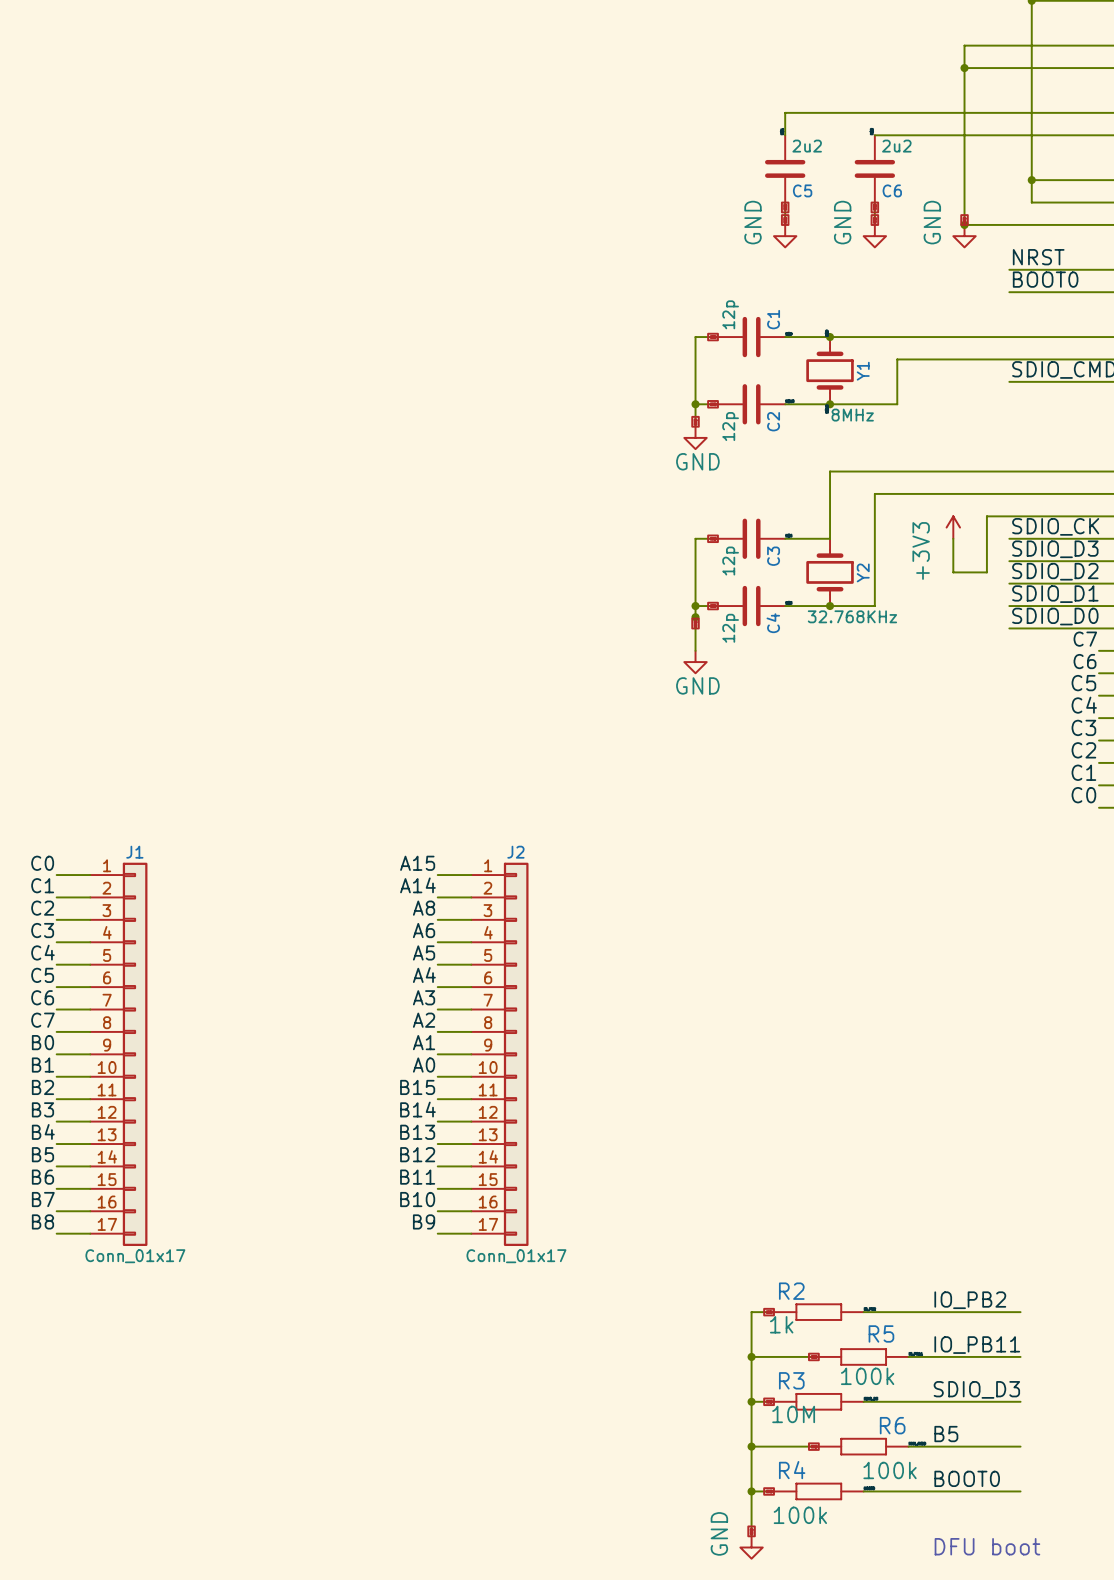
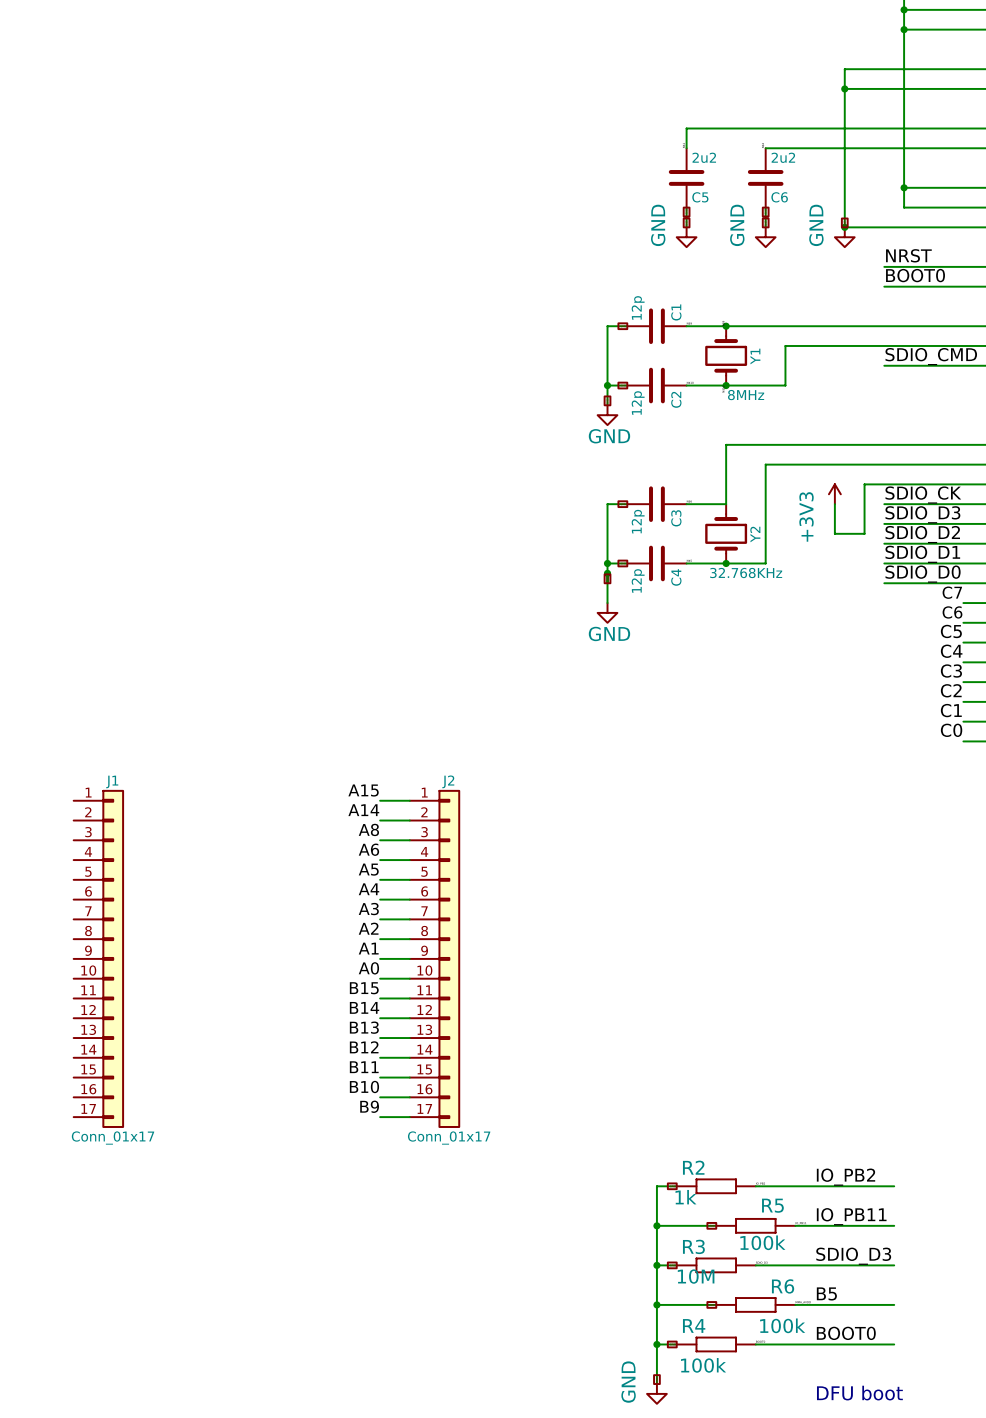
label: C0 (42, 863) -> none
wire: (56, 875) (90, 875) -> none
label: C1 (42, 885) -> none
wire: (56, 897) (90, 897) -> none
label: C2 (42, 908) -> none
wire: (56, 919) (90, 919) -> none
label: C3 (42, 930) -> none
wire: (56, 942) (90, 942) -> none
label: C4 (42, 952) -> none
wire: (56, 964) (90, 964) -> none
label: C5 (42, 975) -> none
wire: (56, 987) (90, 987) -> none
label: C6 (42, 997) -> none
wire: (56, 1009) (90, 1009) -> none
label: C7 (42, 1020) -> none
wire: (56, 1031) (90, 1031) -> none
label: B0 (42, 1042) -> none
wire: (56, 1054) (90, 1054) -> none
label: B1 (42, 1065) -> none
wire: (56, 1076) (90, 1076) -> none
label: B2 (42, 1087) -> none
wire: (56, 1099) (90, 1099) -> none
label: B3 (42, 1109) -> none
wire: (56, 1121) (90, 1121) -> none
label: B4 (43, 1131) -> none
wire: (56, 1144) (90, 1144) -> none
label: B5 (42, 1154) -> none
wire: (56, 1166) (90, 1166) -> none
label: B6 (42, 1177) -> none
wire: (56, 1188) (90, 1188) -> none
label: B7 (43, 1199) -> none
wire: (56, 1211) (90, 1211) -> none
label: B8 (42, 1221) -> none
wire: (56, 1233) (90, 1233) -> none

